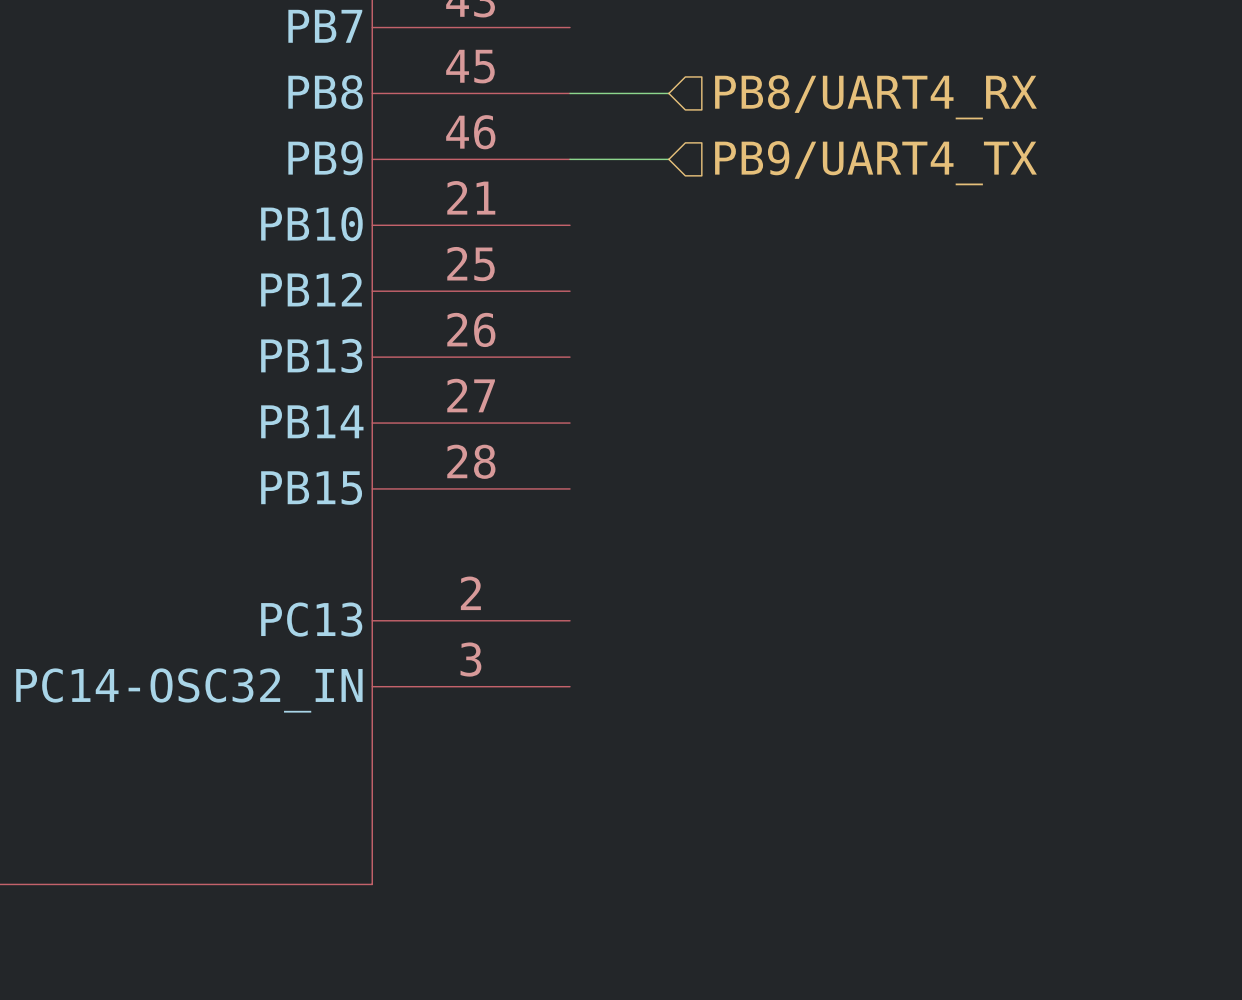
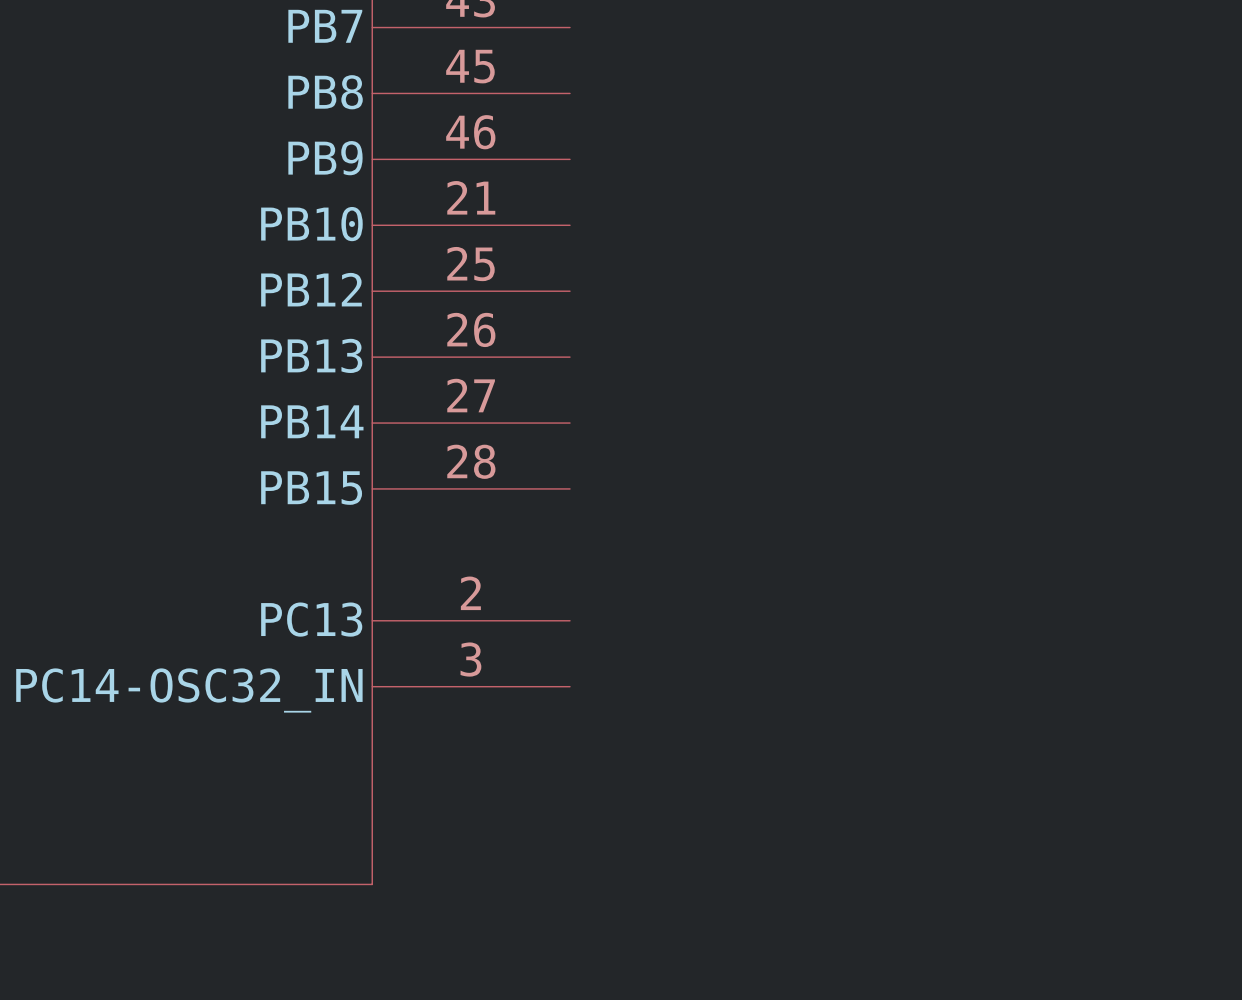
wire: (570, 93) (668, 93) -> none
hierarchical label: PB8/UART4_RX (875, 97) -> none
wire: (570, 159) (668, 159) -> none
hierarchical label: PB9/UART4_TX (875, 163) -> none

